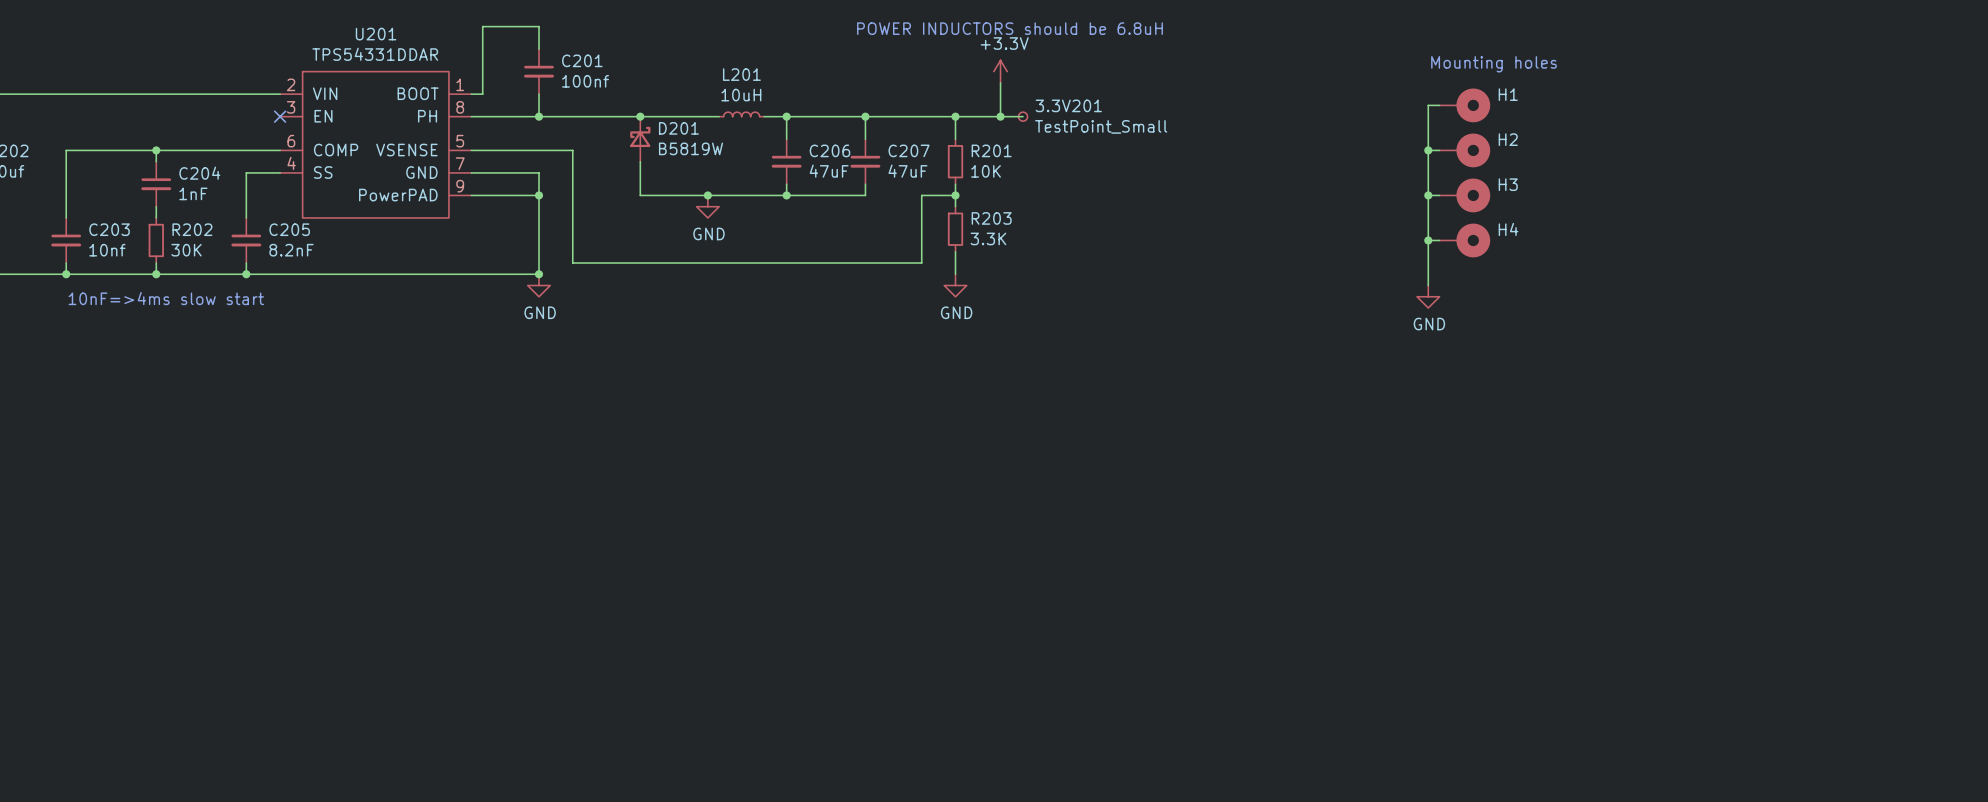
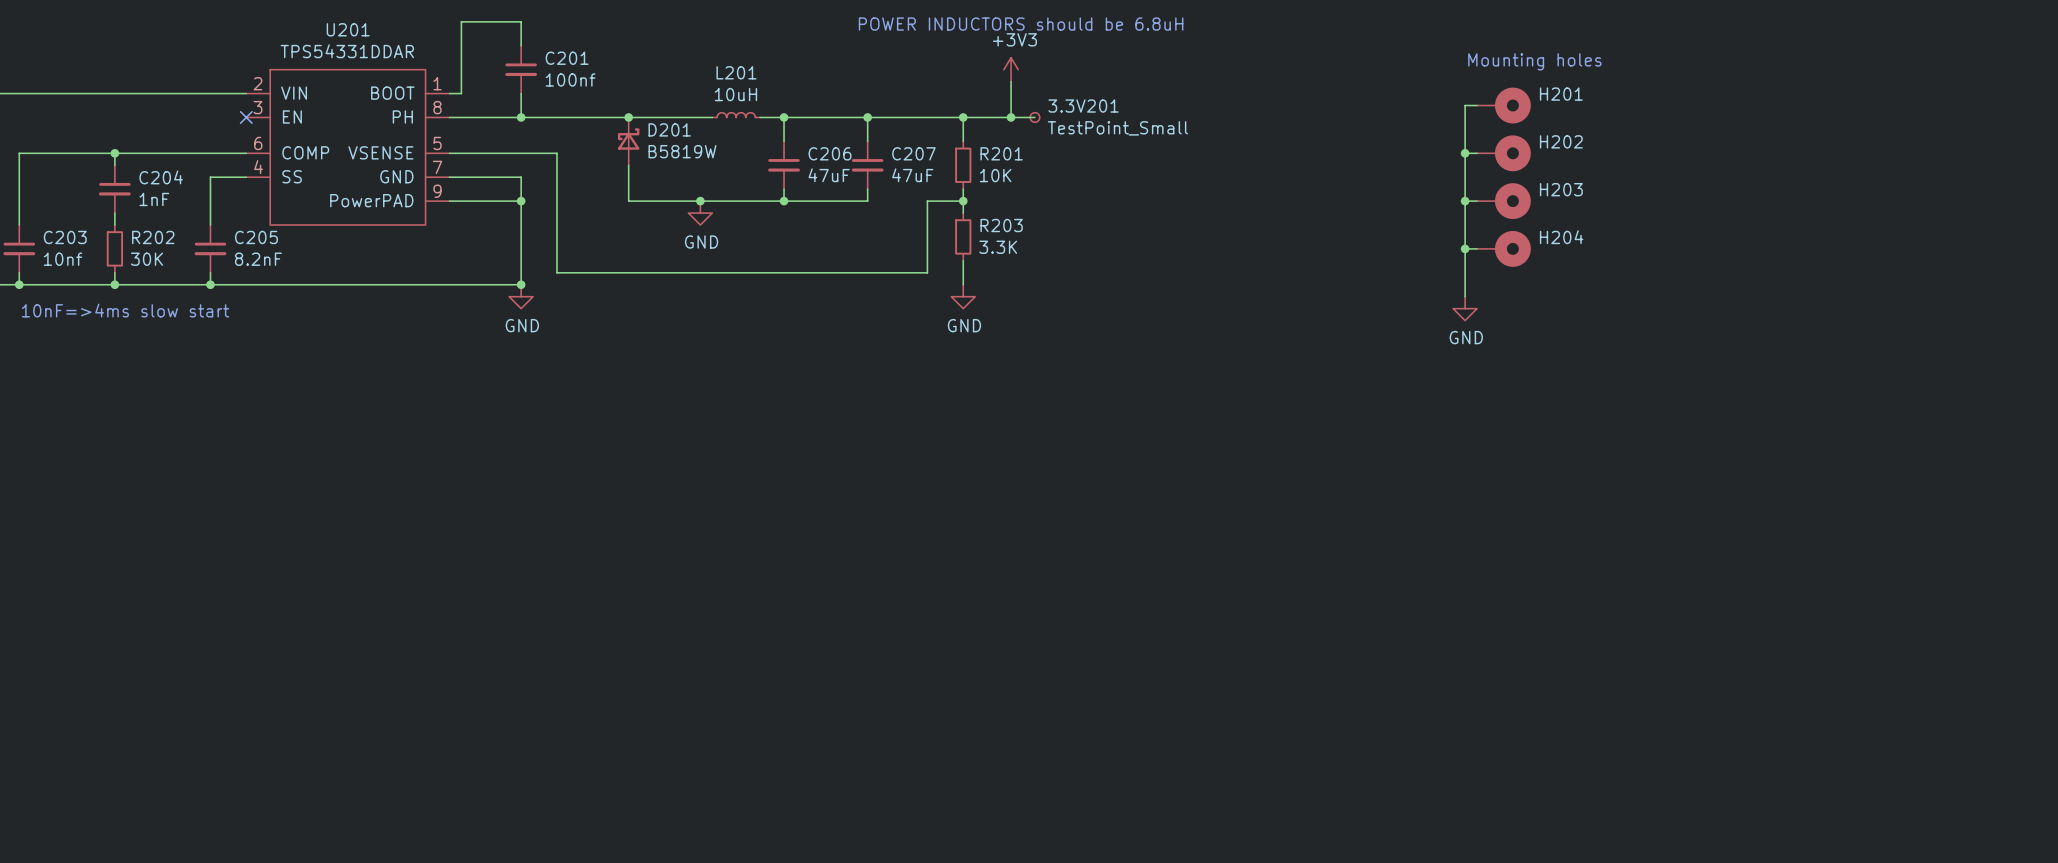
power symbol: +3.3V (1000, 71) -> +3V3 (1011, 69)
H1 name: H1 (1508, 94) -> H201 (1561, 94)
H2 name: H2 (1508, 139) -> H202 (1561, 141)
H3 name: H3 (1508, 184) -> H203 (1561, 189)
H4 name: H4 (1508, 229) -> H204 (1561, 237)

